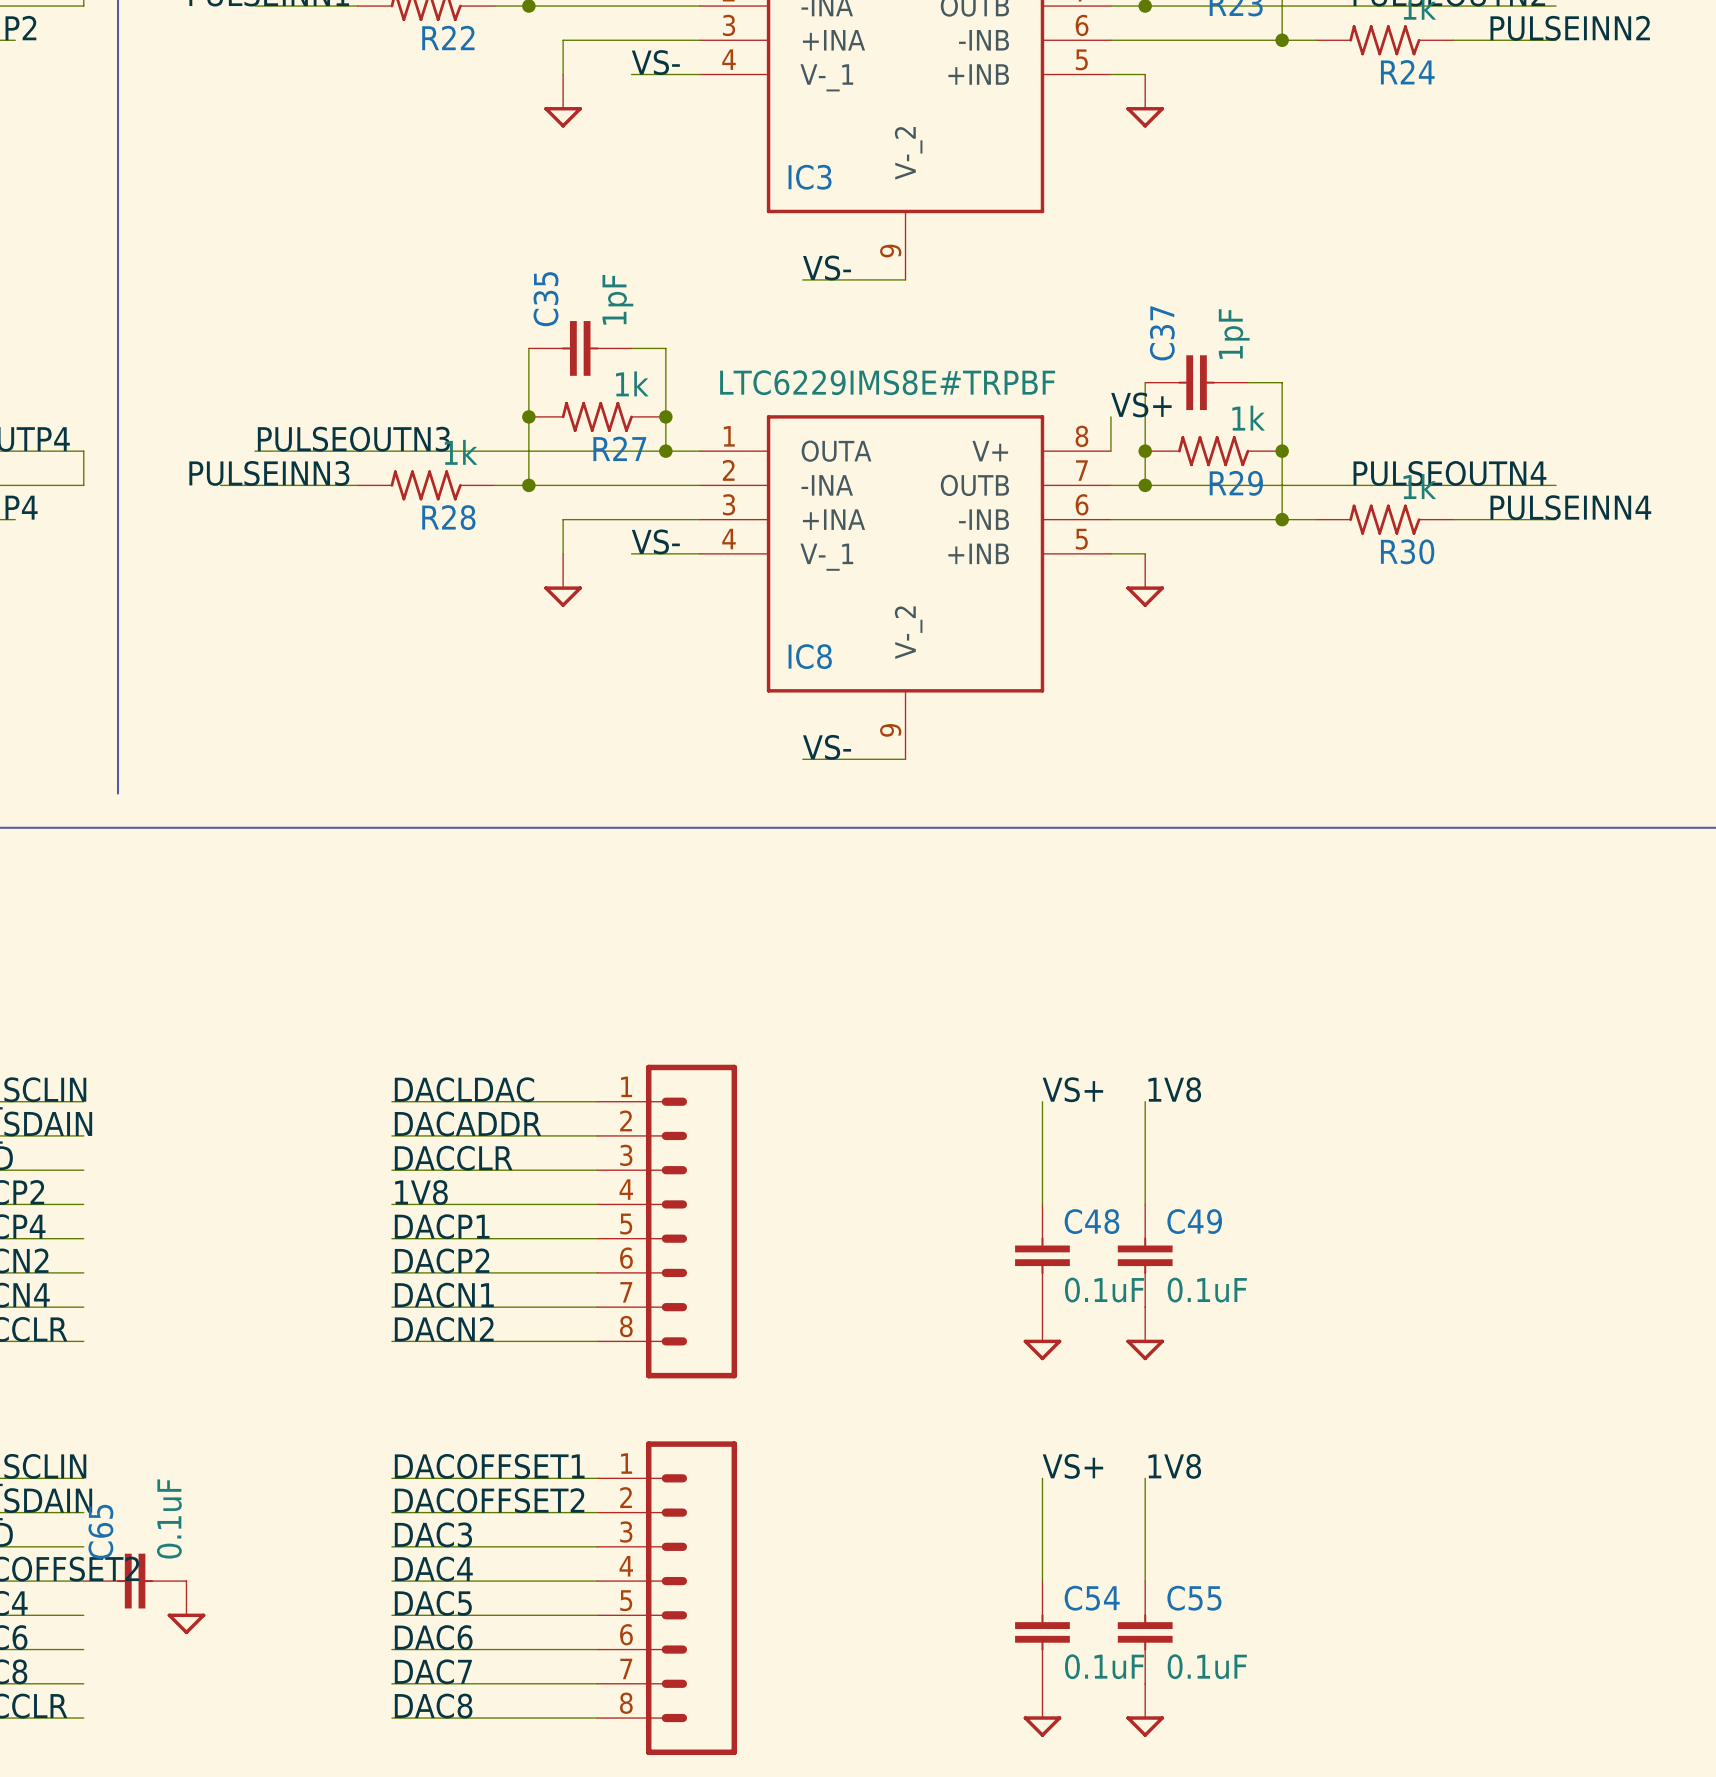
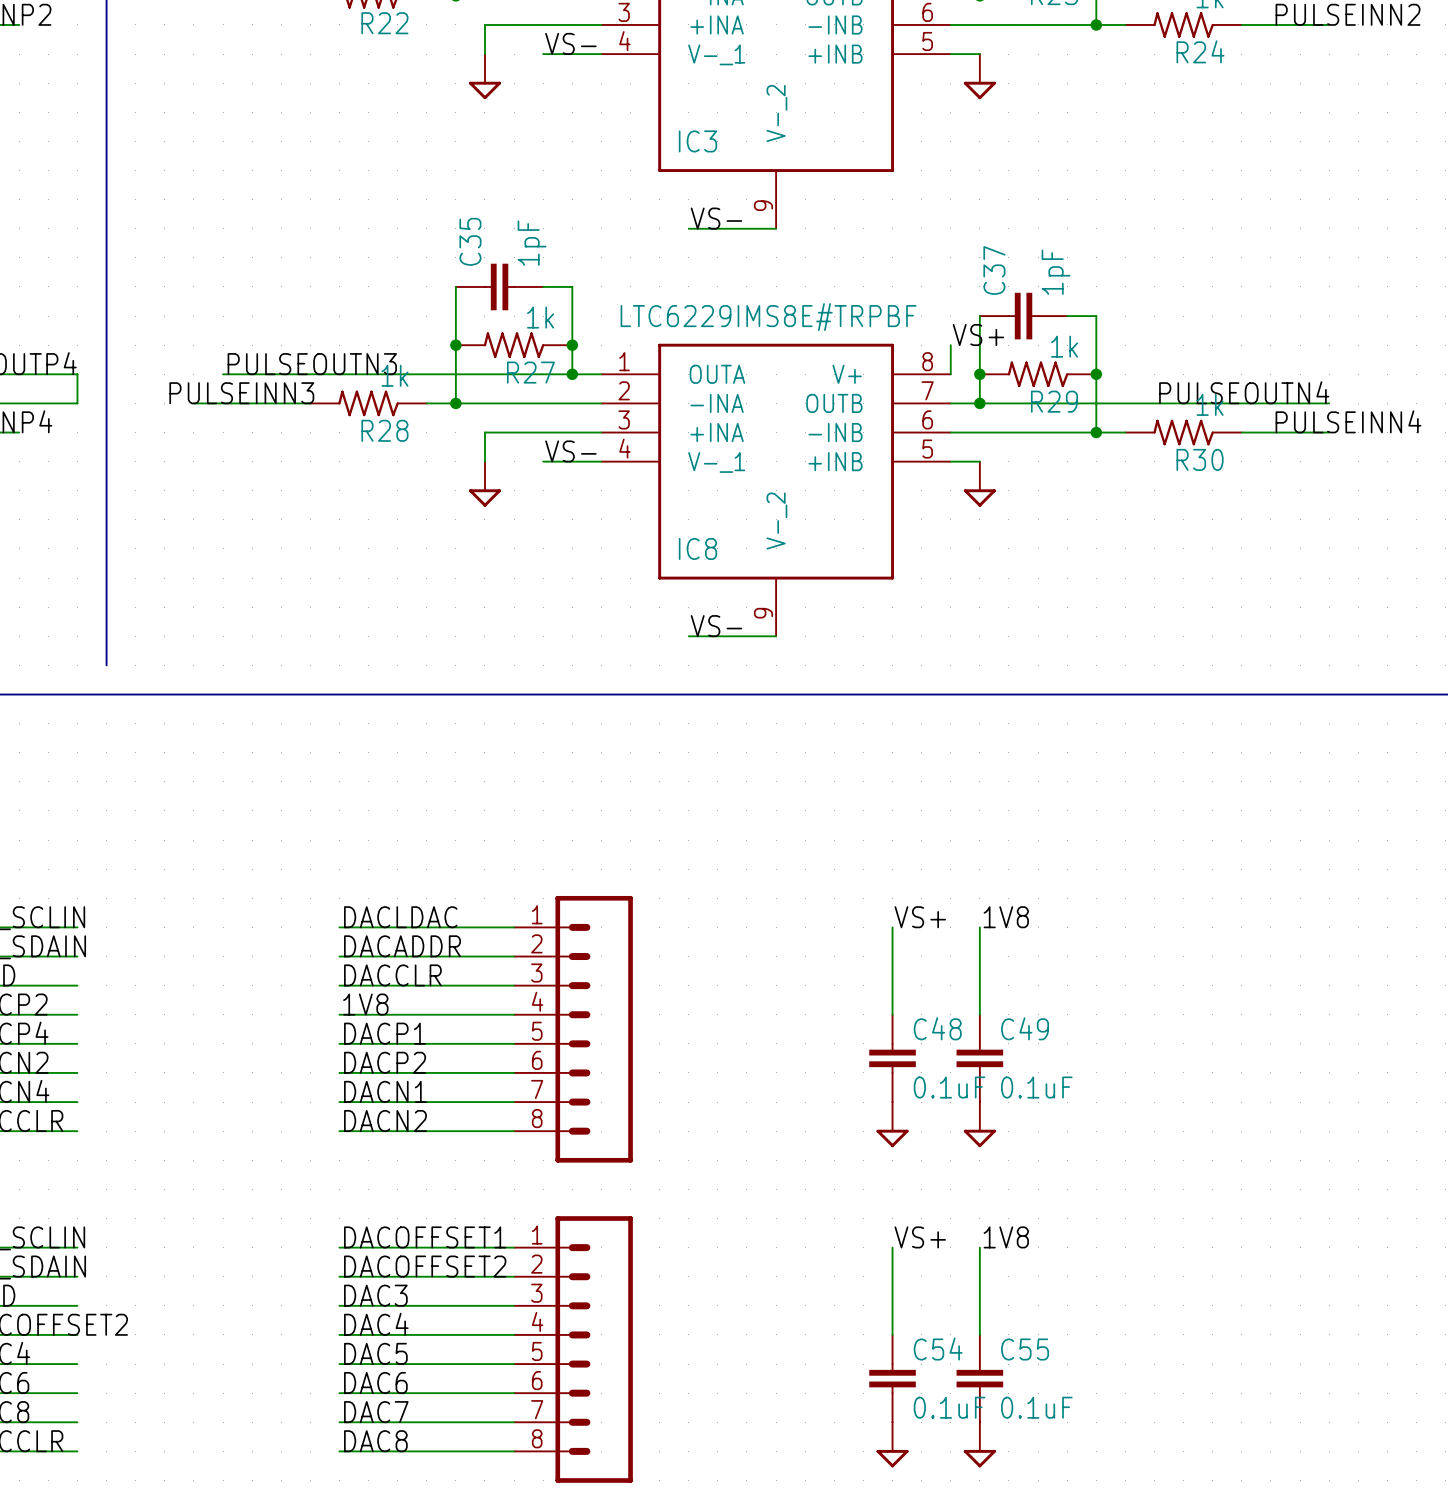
C65: 0.1uF (135, 1581) -> none
power symbol: (186, 1607) -> none

